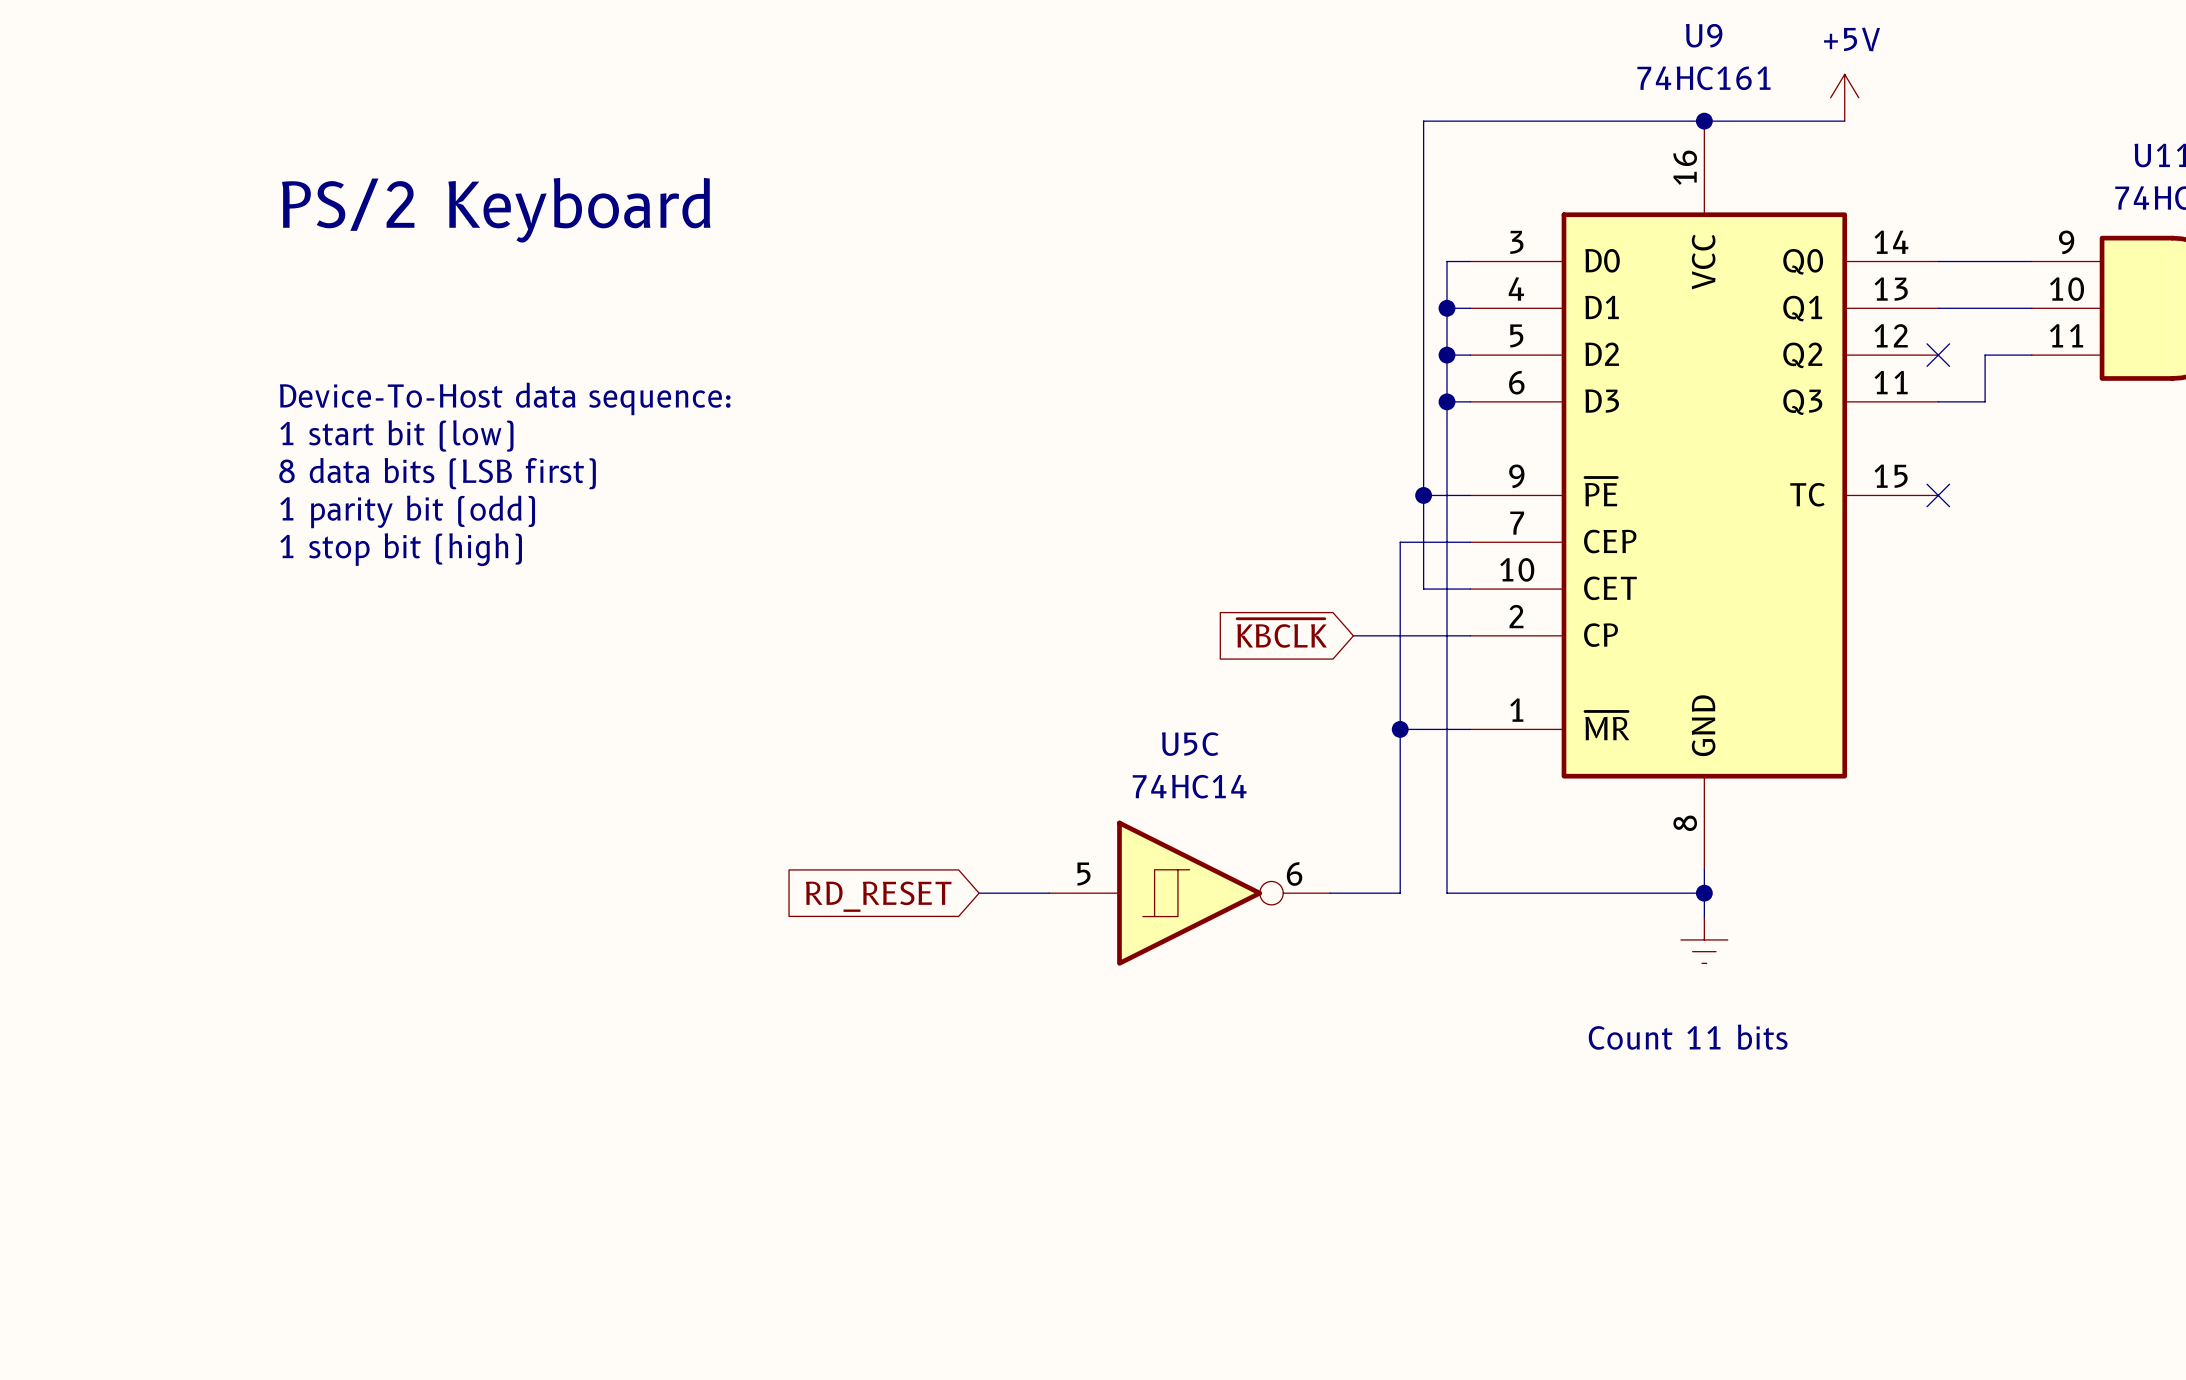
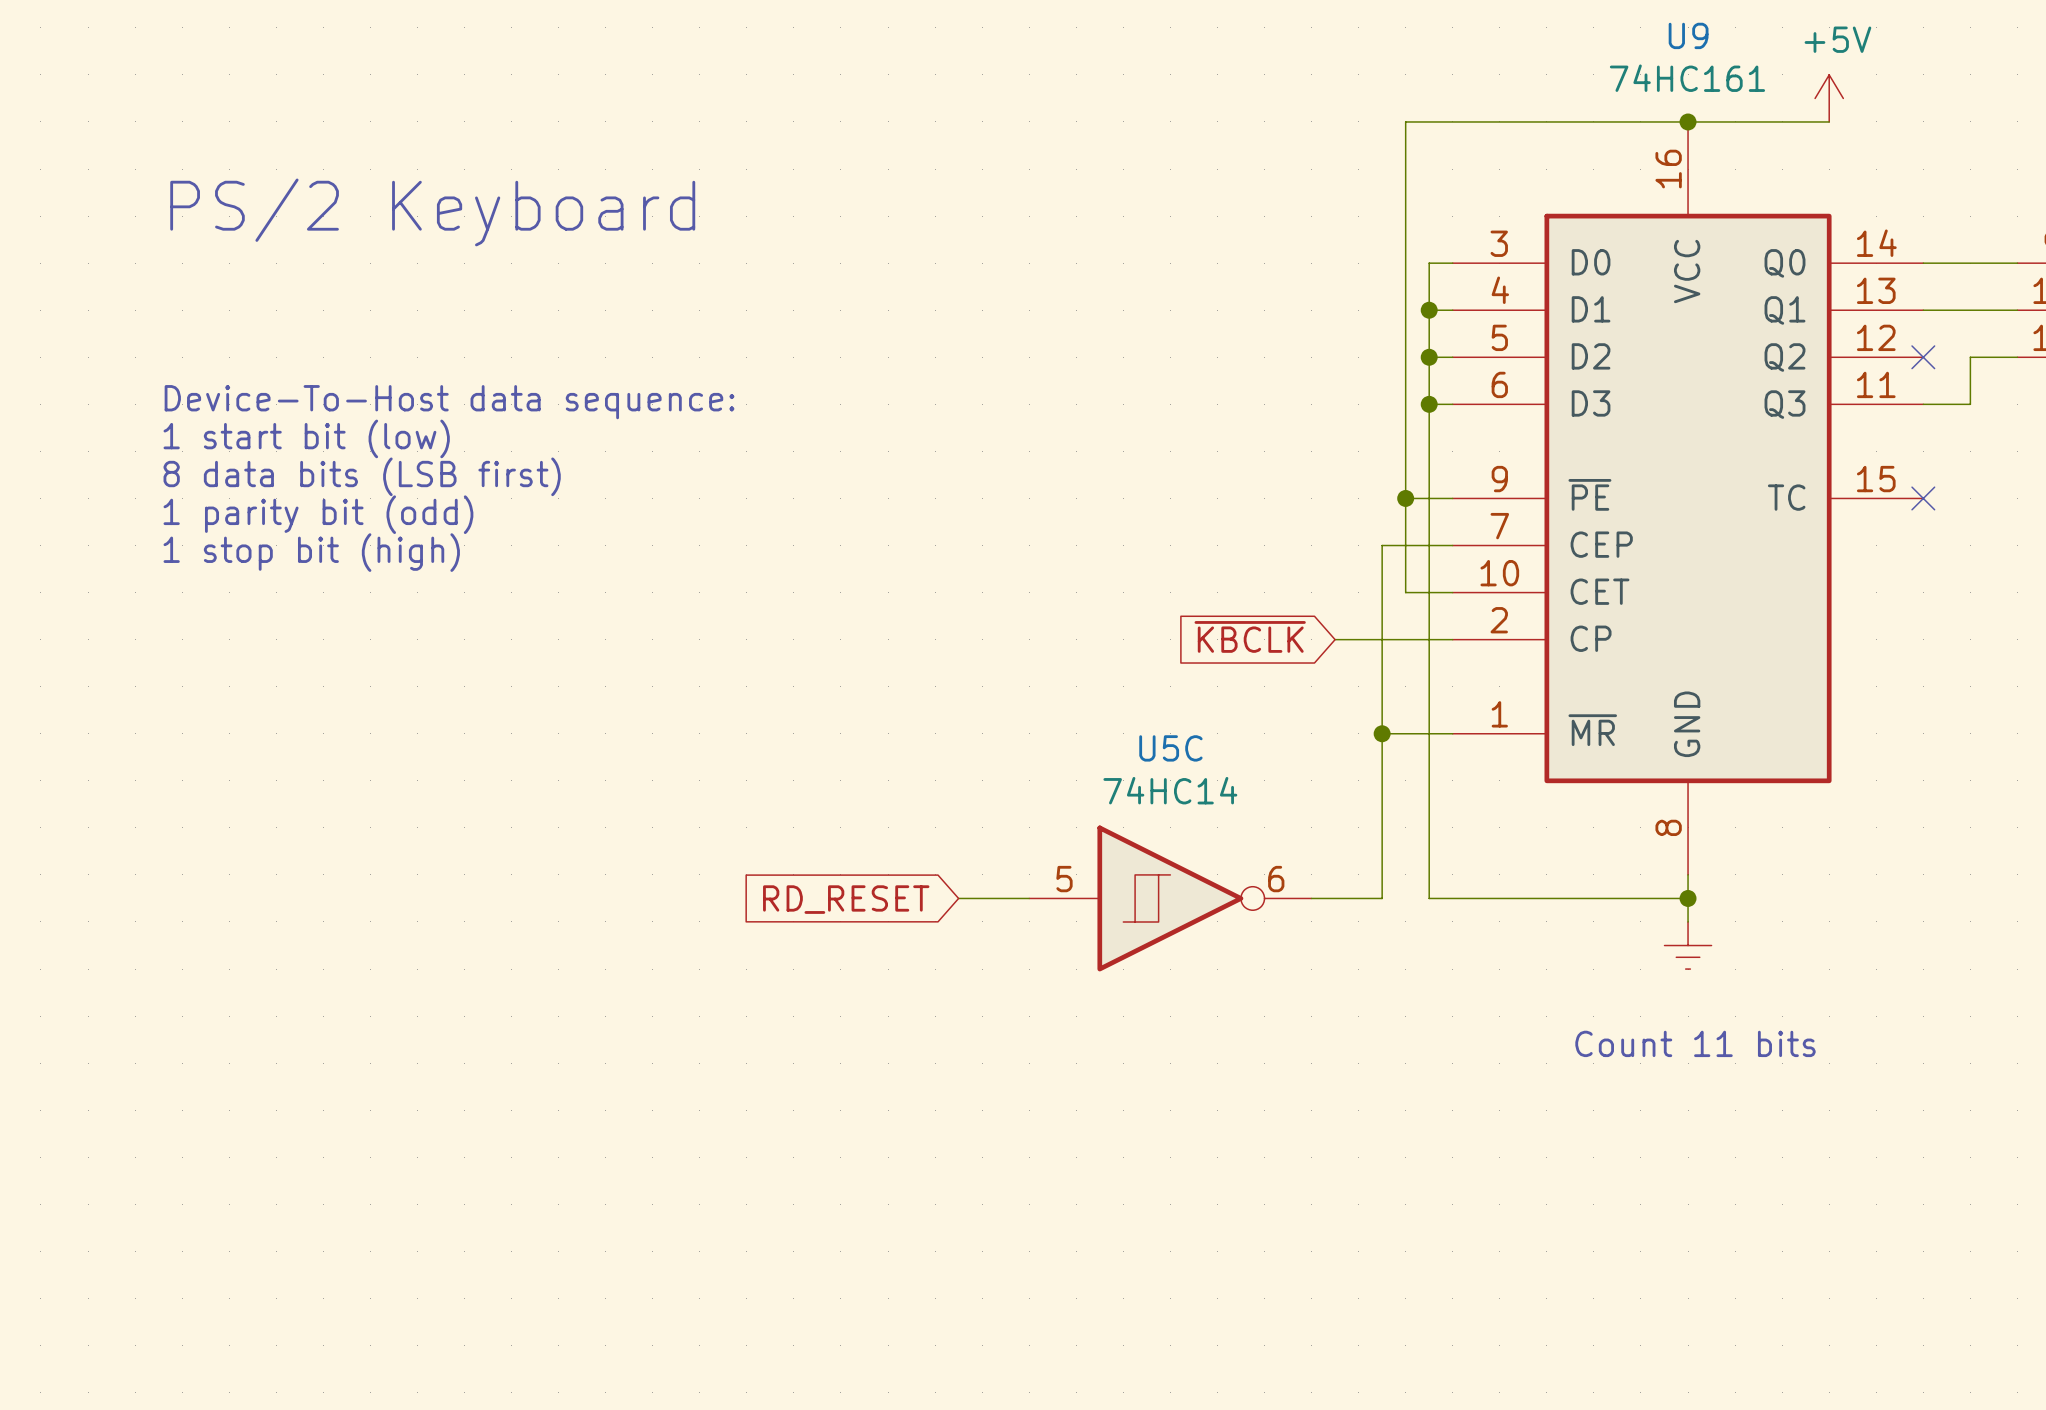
text position: PS/2 Keyboard (496, 210) -> PS/2 Keyboard (432, 212)
text position: Device-To-Host data sequence: (505, 398) -> Device-To-Host data sequence: (449, 402)
text position: 1 start bit (low) (396, 435) -> 1 start bit (low) (306, 438)
text position: 8 data bits (LSB first) (437, 473) -> 8 data bits (LSB first) (362, 476)
text position: 1 parity bit (odd) (407, 511) -> 1 parity bit (odd) (318, 514)
text position: 1 stop bit (high) (401, 549) -> 1 stop bit (high) (311, 552)

